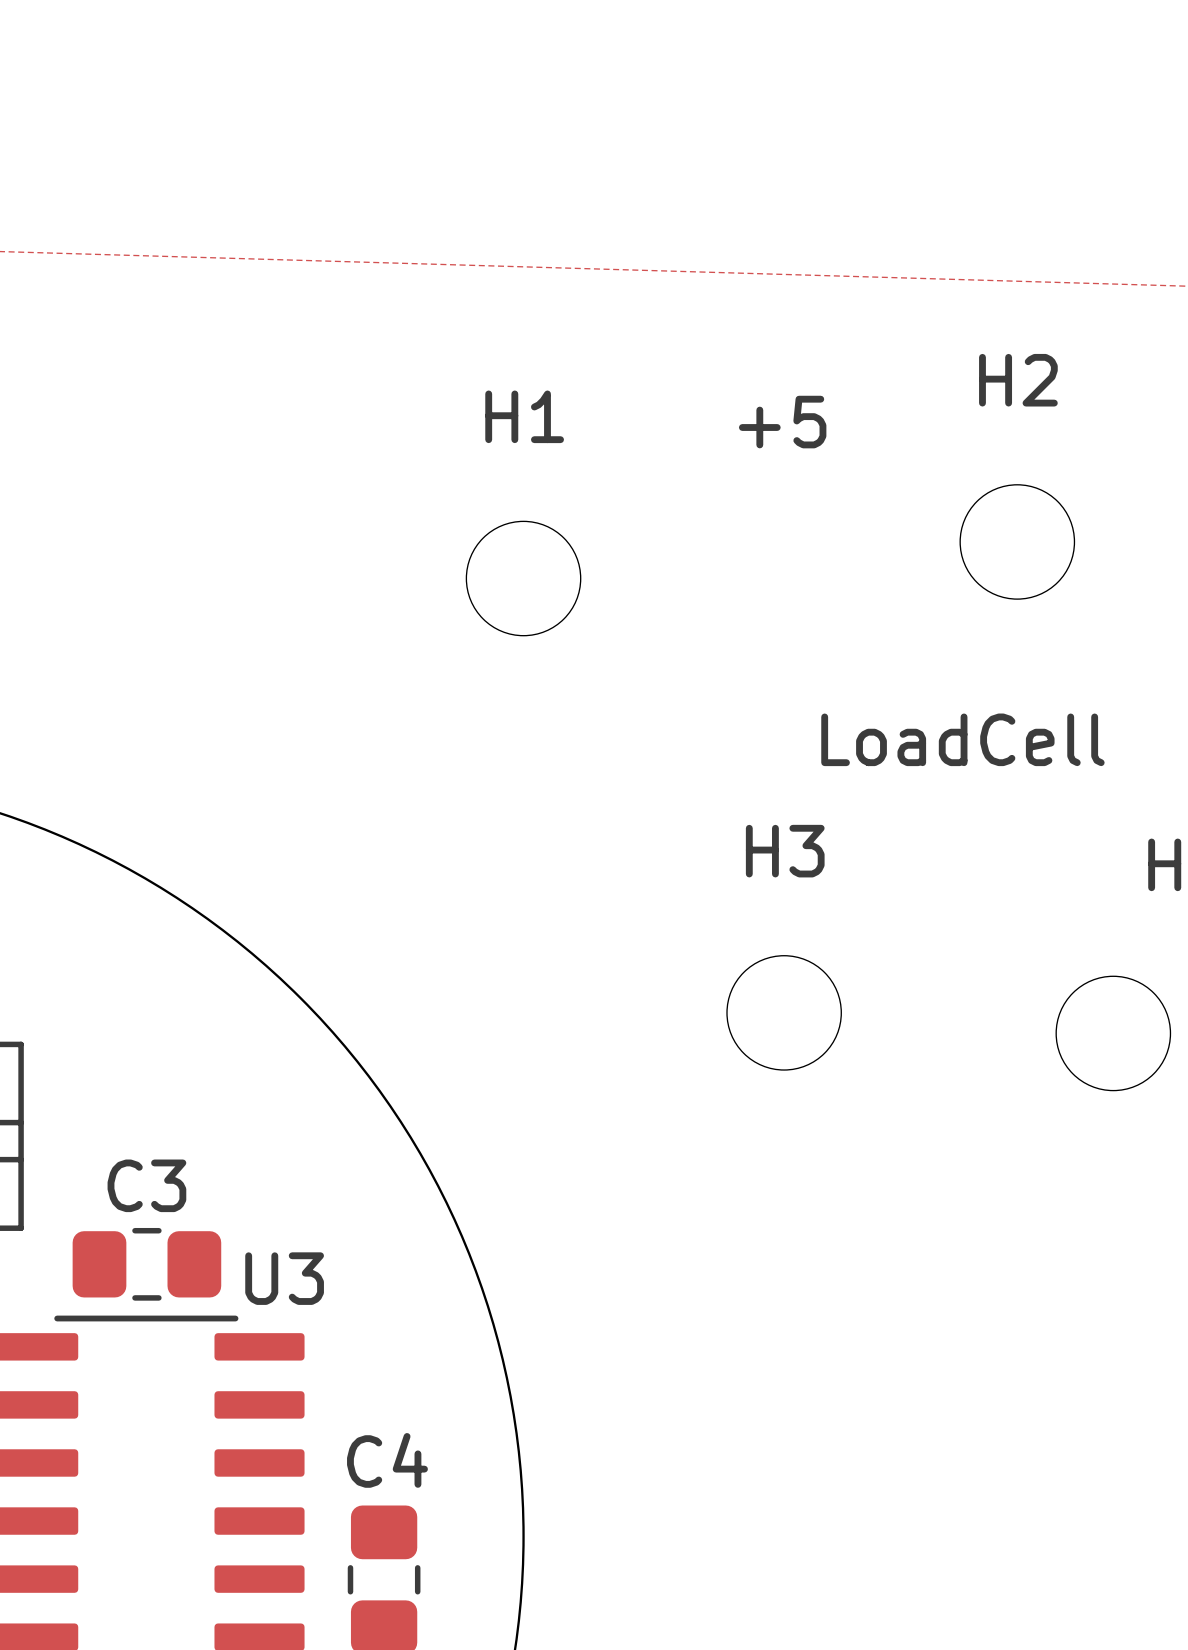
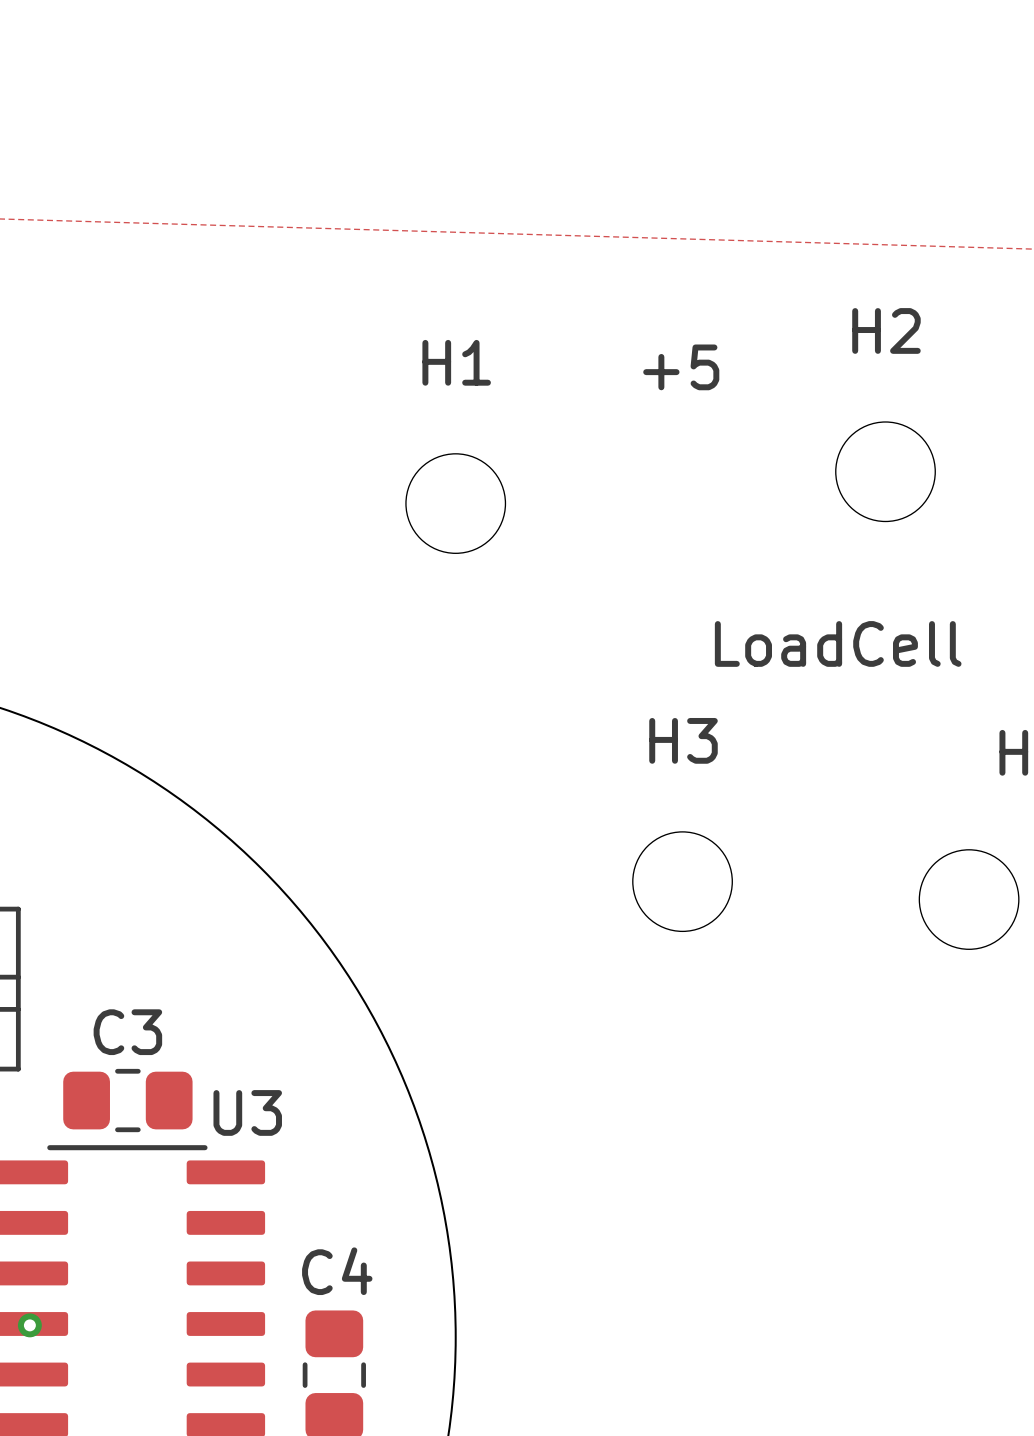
via: none -> (29, 1325)

